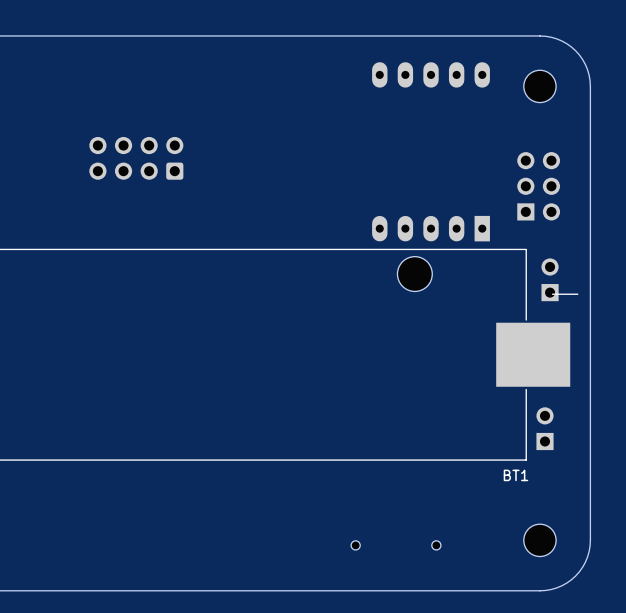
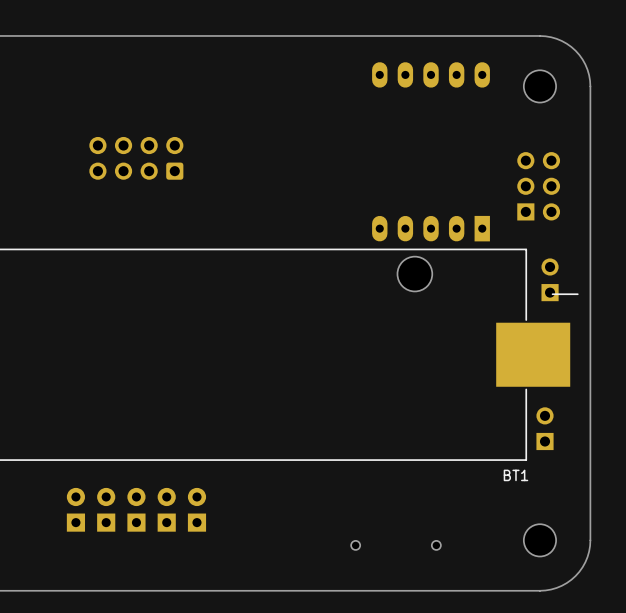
part: none -> (75, 509)
part: none -> (106, 509)
part: none -> (136, 509)
part: none -> (166, 509)
part: none -> (196, 509)

